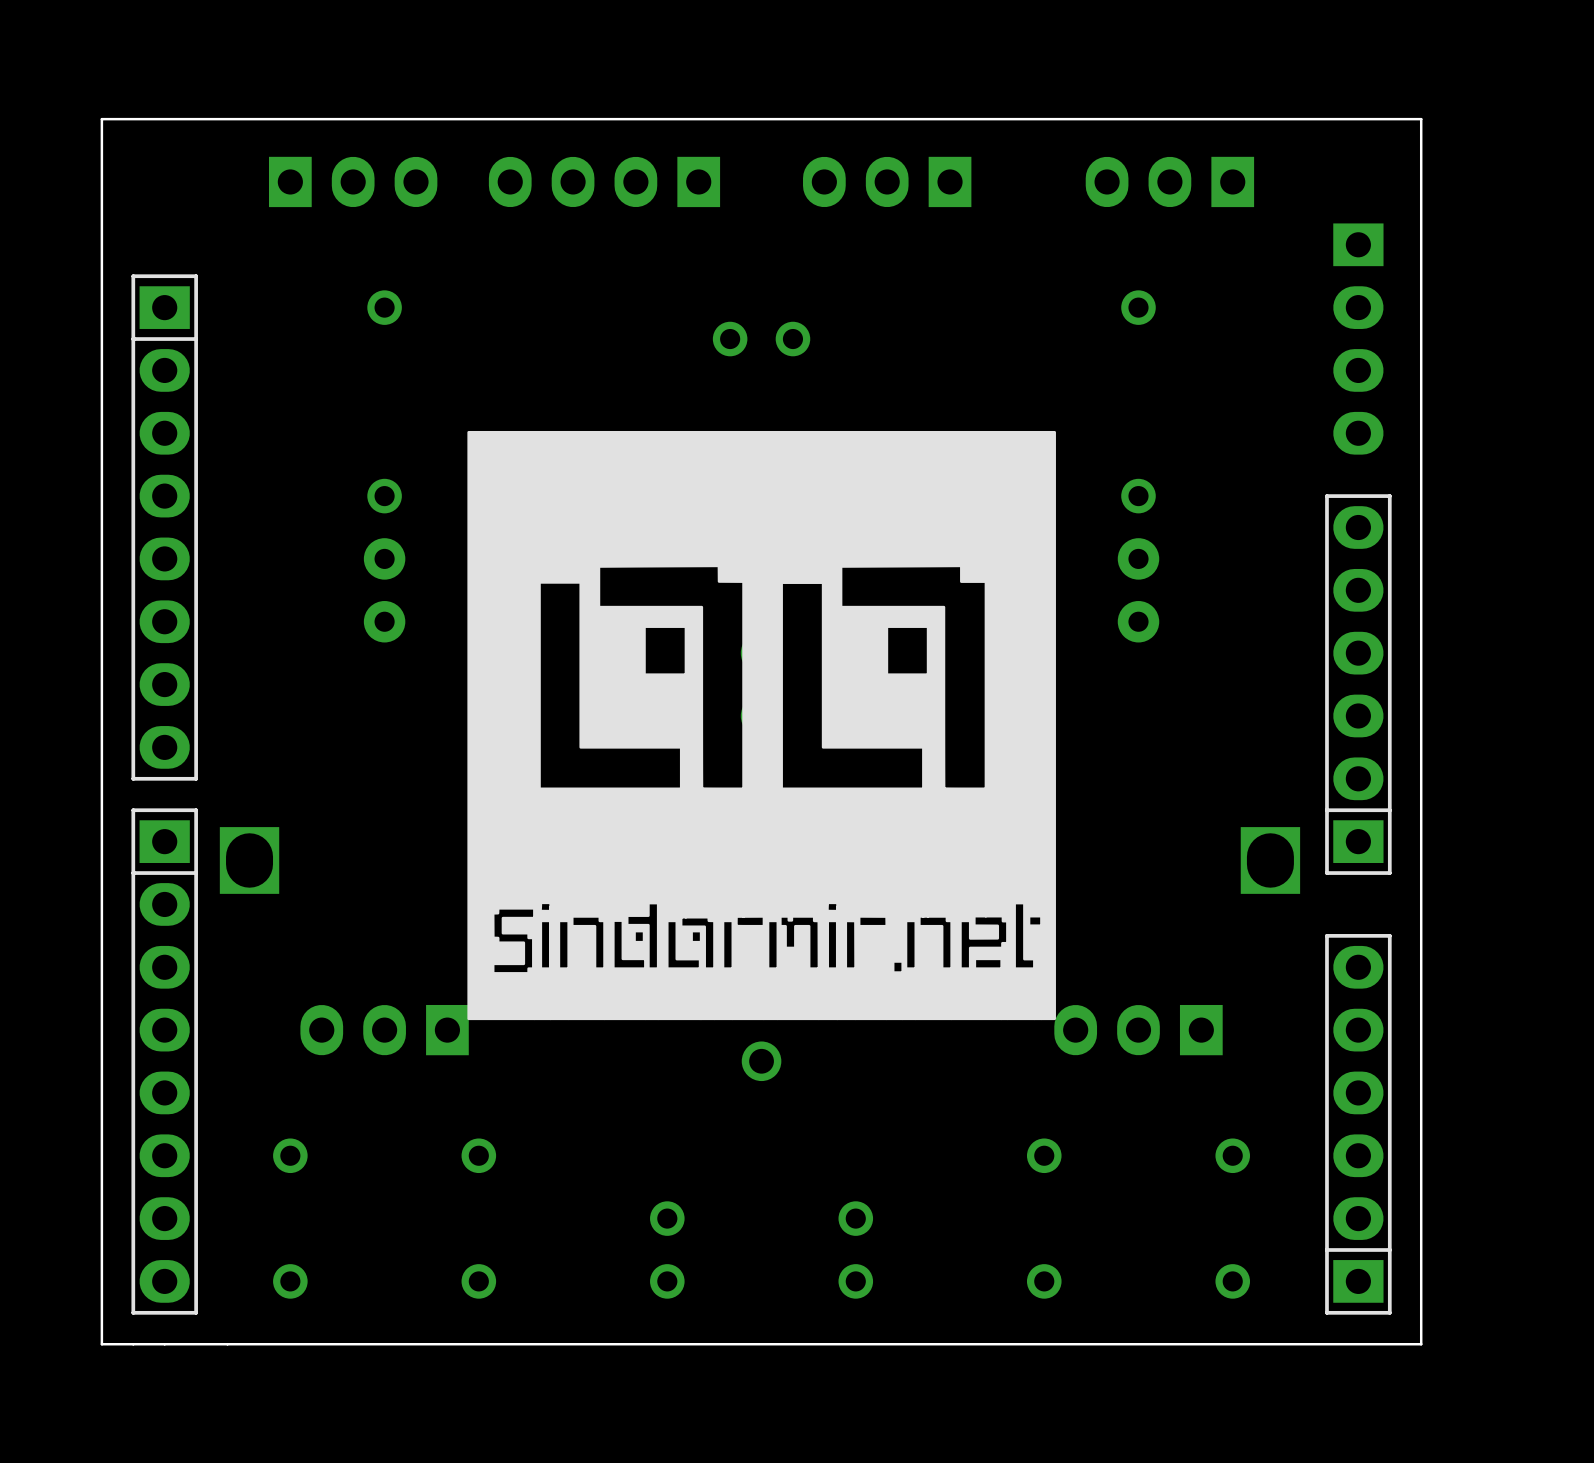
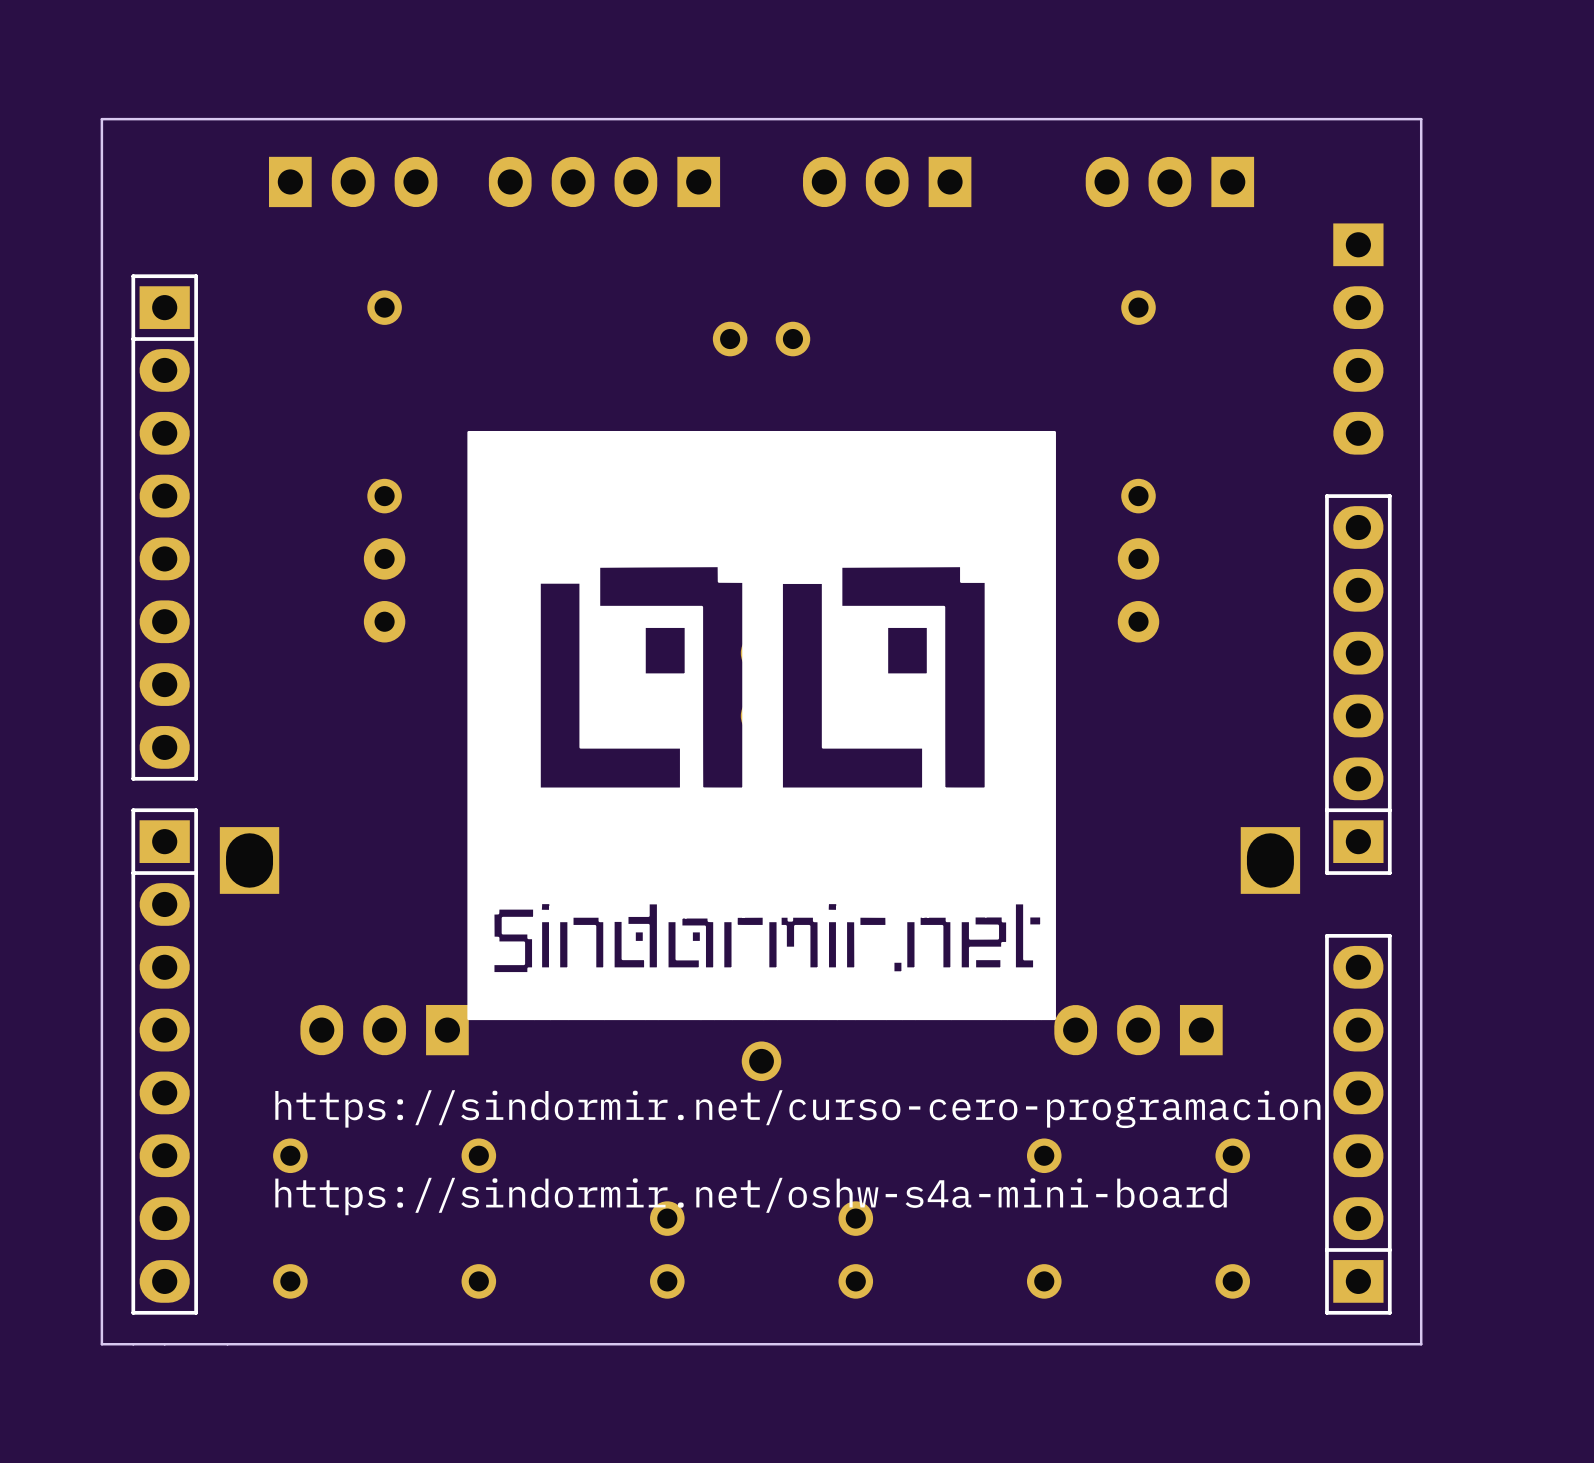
text: none -> https://sindormir.net/curso-cero-programacion (797, 1109)
text: none -> https://sindormir.net/oshw-s4a-mini-board (751, 1196)

